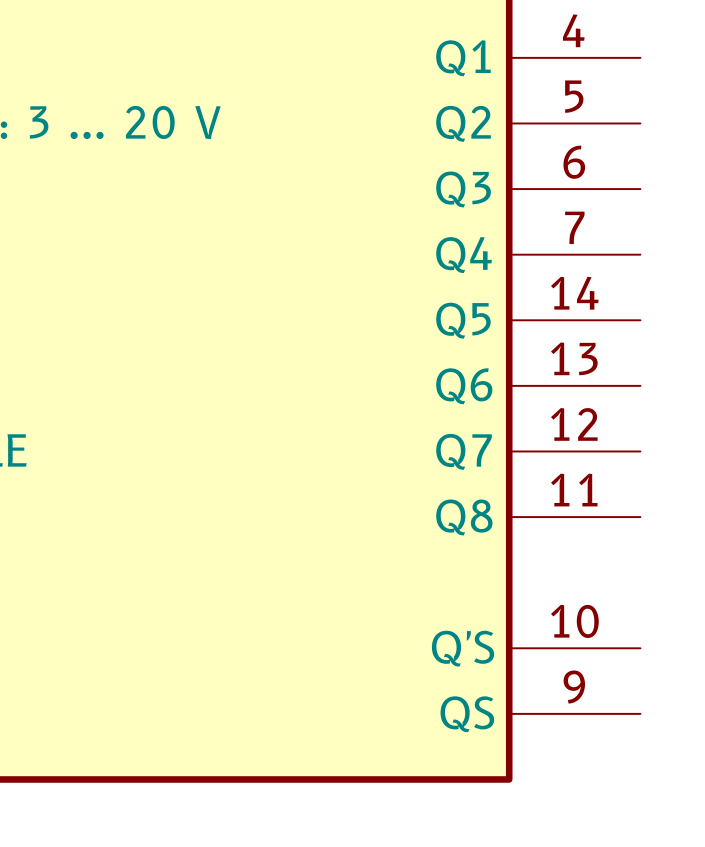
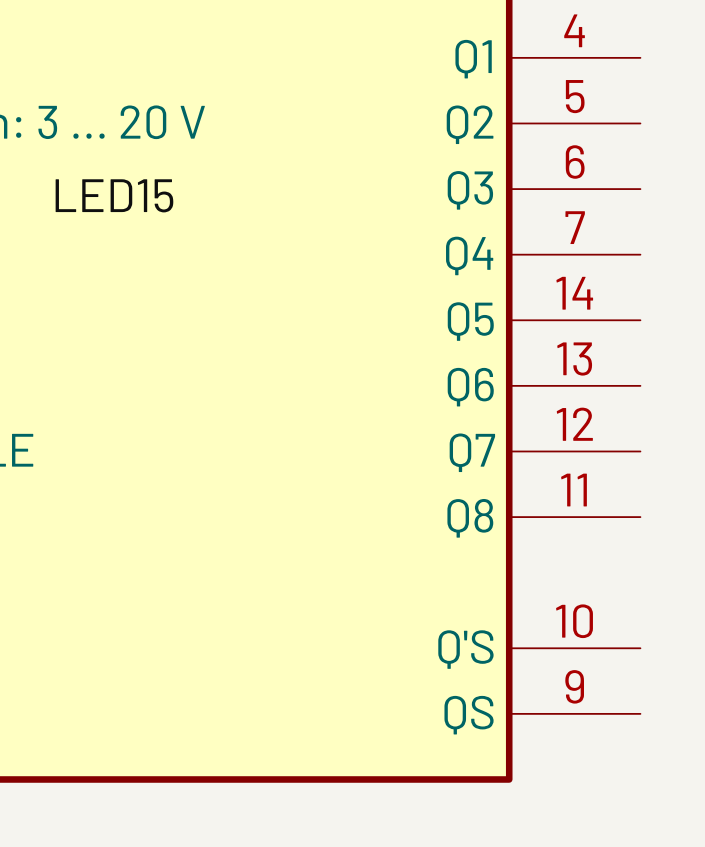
label: none -> LED15 (114, 195)

